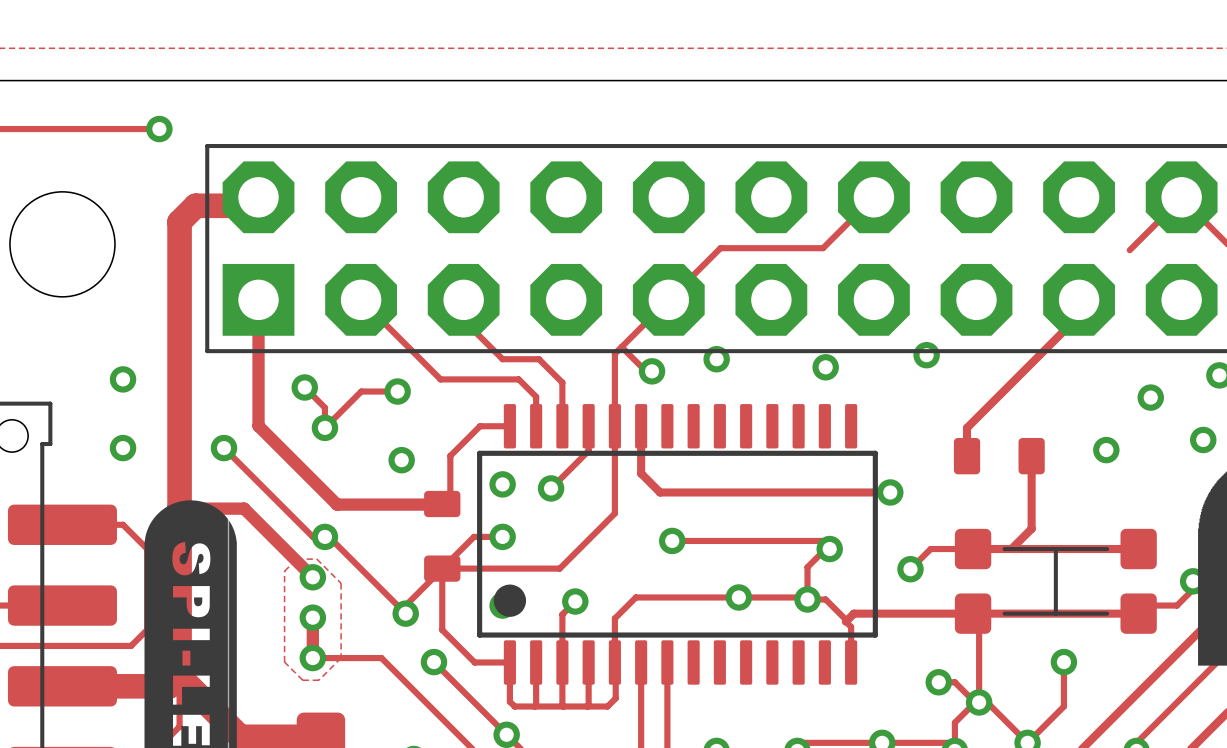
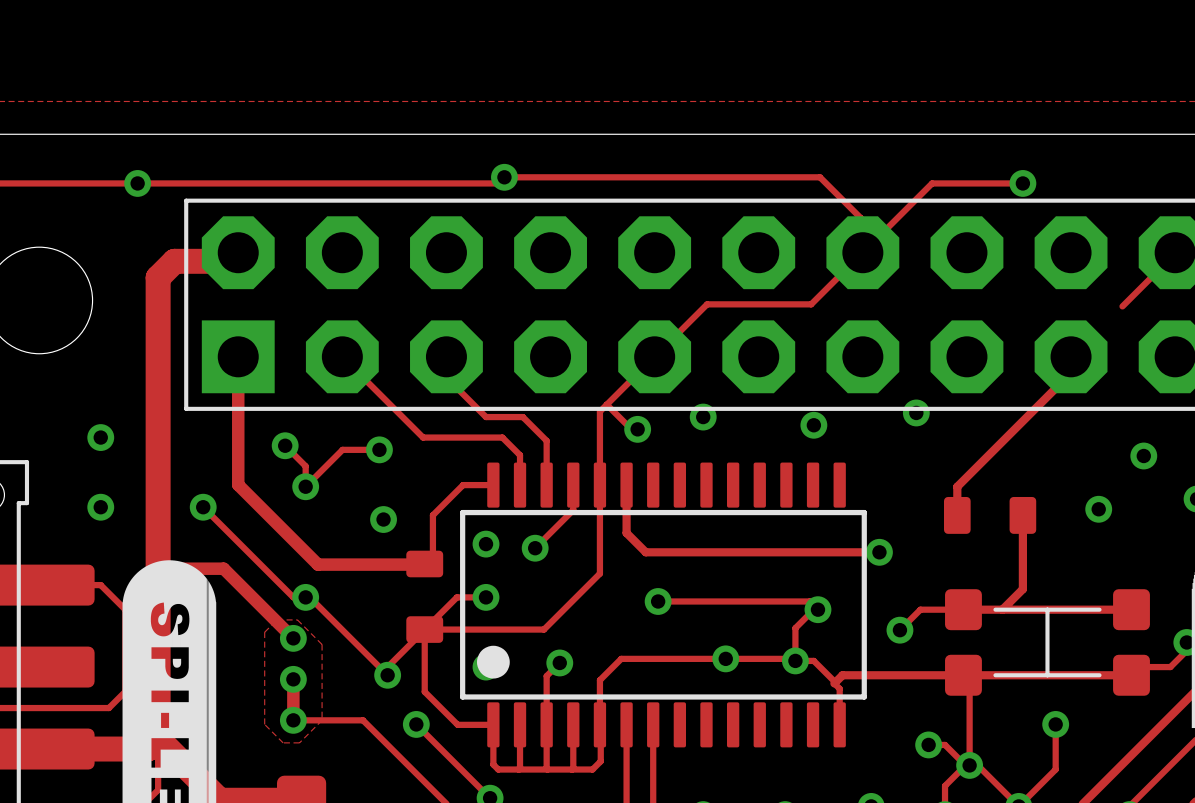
via: none -> (504, 177)
track: none -> (137, 183) (498, 183) (504, 177) (820, 177) (860, 217) (860, 254)
track: none -> (1022, 183) (932, 183) (862, 252)
via: none -> (1022, 183)

